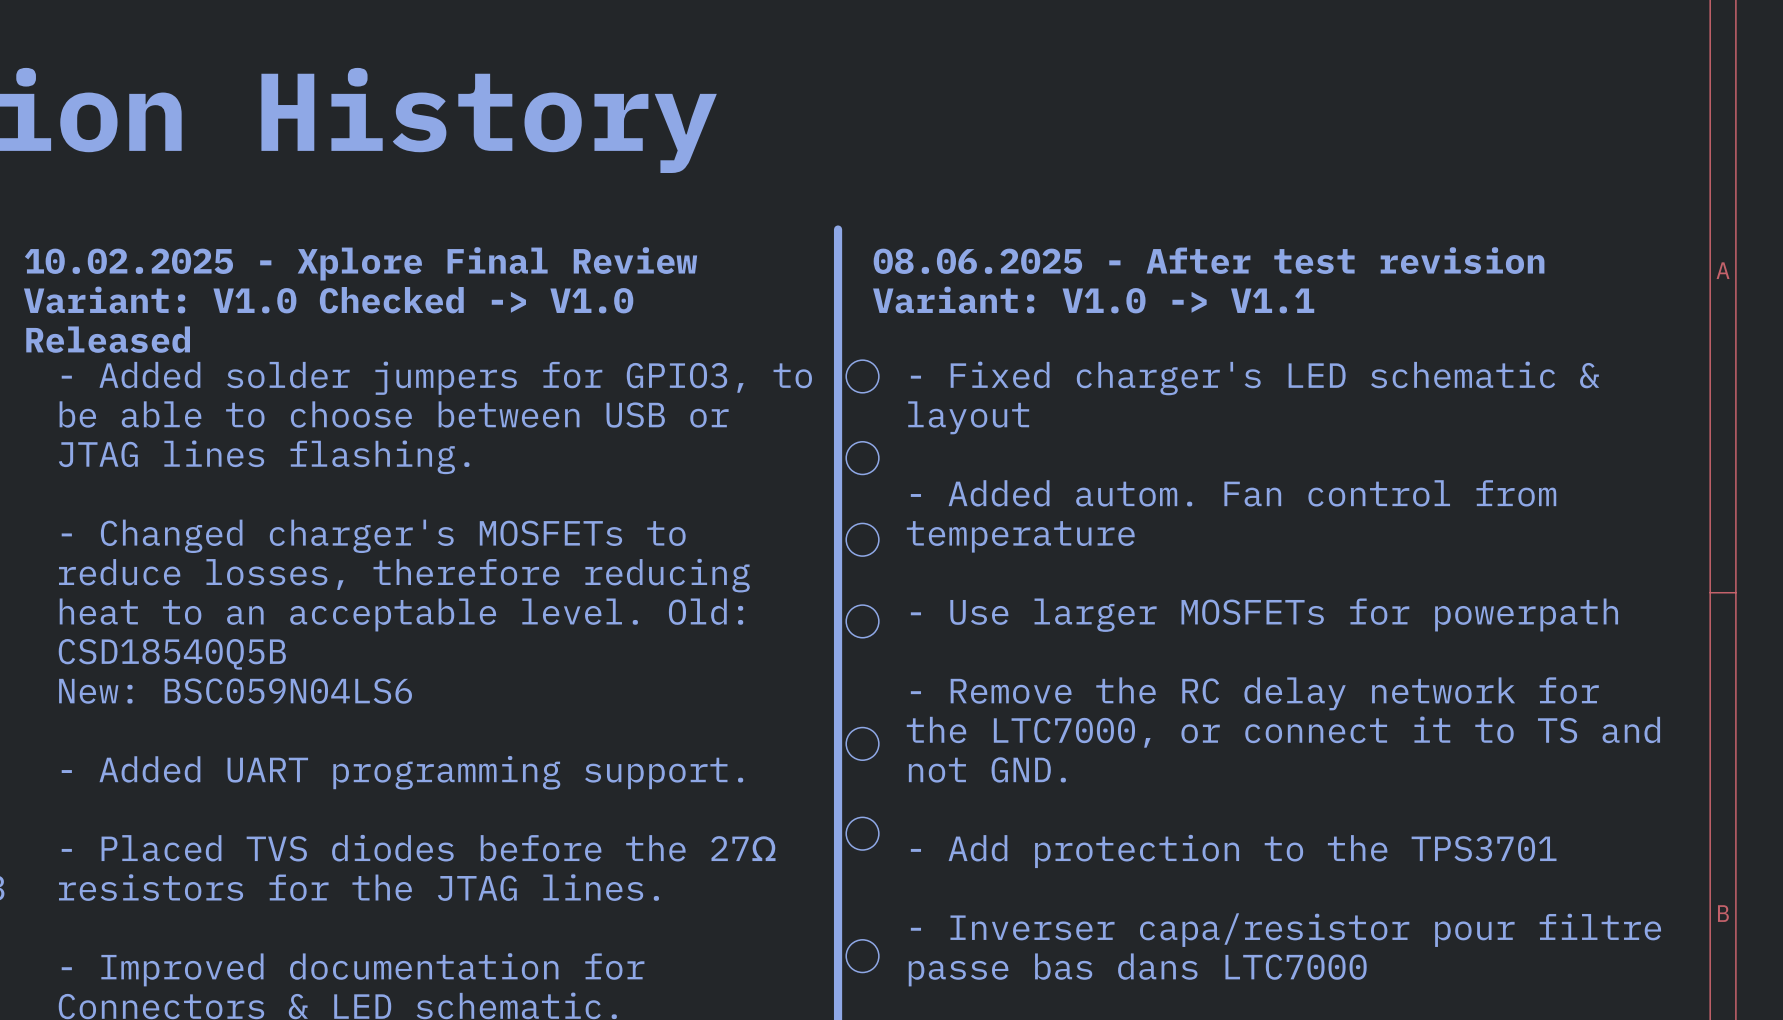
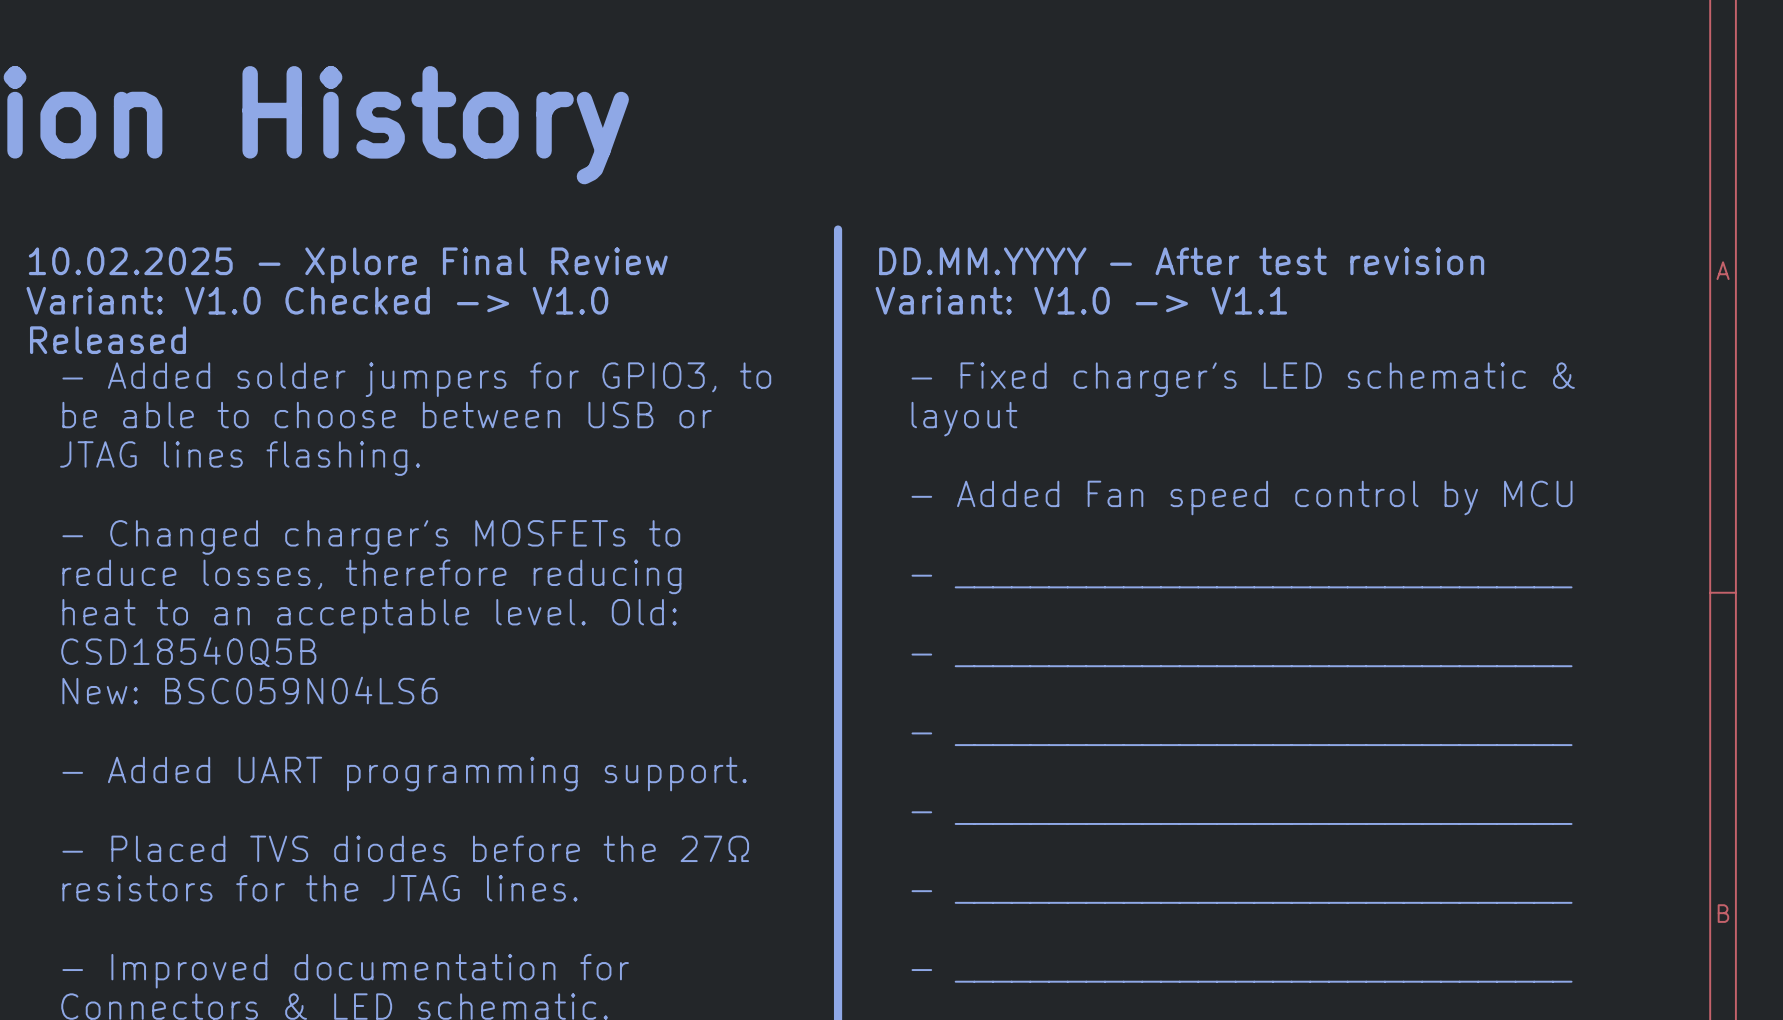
text: 08.06.2025 - After test revision (1209, 260) -> DD.MM.YYYY - After test revision (1181, 261)
drawing: [846, 360, 879, 393] -> none
drawing: [846, 441, 879, 475] -> none
text: - Added autom. Fan control from (1233, 493) -> - Added Fan speed control by MCU (1242, 497)
drawing: [846, 523, 879, 557] -> none
text: temperature (1020, 536) -> none
text: none -> - _________________________________ (1242, 581)
drawing: [846, 605, 879, 638] -> none
text: - Use larger MOSFETs for powerpath (1264, 615) -> none
text: none -> - _________________________________ (1242, 660)
text: - Remove the RC delay network for (1254, 693) -> none
drawing: [846, 727, 879, 761] -> none
text: the LTC7000, or connect it to TS and (1283, 732) -> - _________________________________ (1242, 739)
text: not GND. (987, 769) -> none
drawing: [846, 817, 879, 851] -> none
text: none -> - _________________________________ (1242, 818)
text: - Add protection to the TPS3701 (1233, 851) -> none
text: none -> - _________________________________ (1242, 897)
text: - Inverser capa/resistor pour filtre (1285, 930) -> none
drawing: [846, 939, 879, 973] -> none
text: passe bas dans LTC7000 (1137, 969) -> - _________________________________ (1242, 975)

